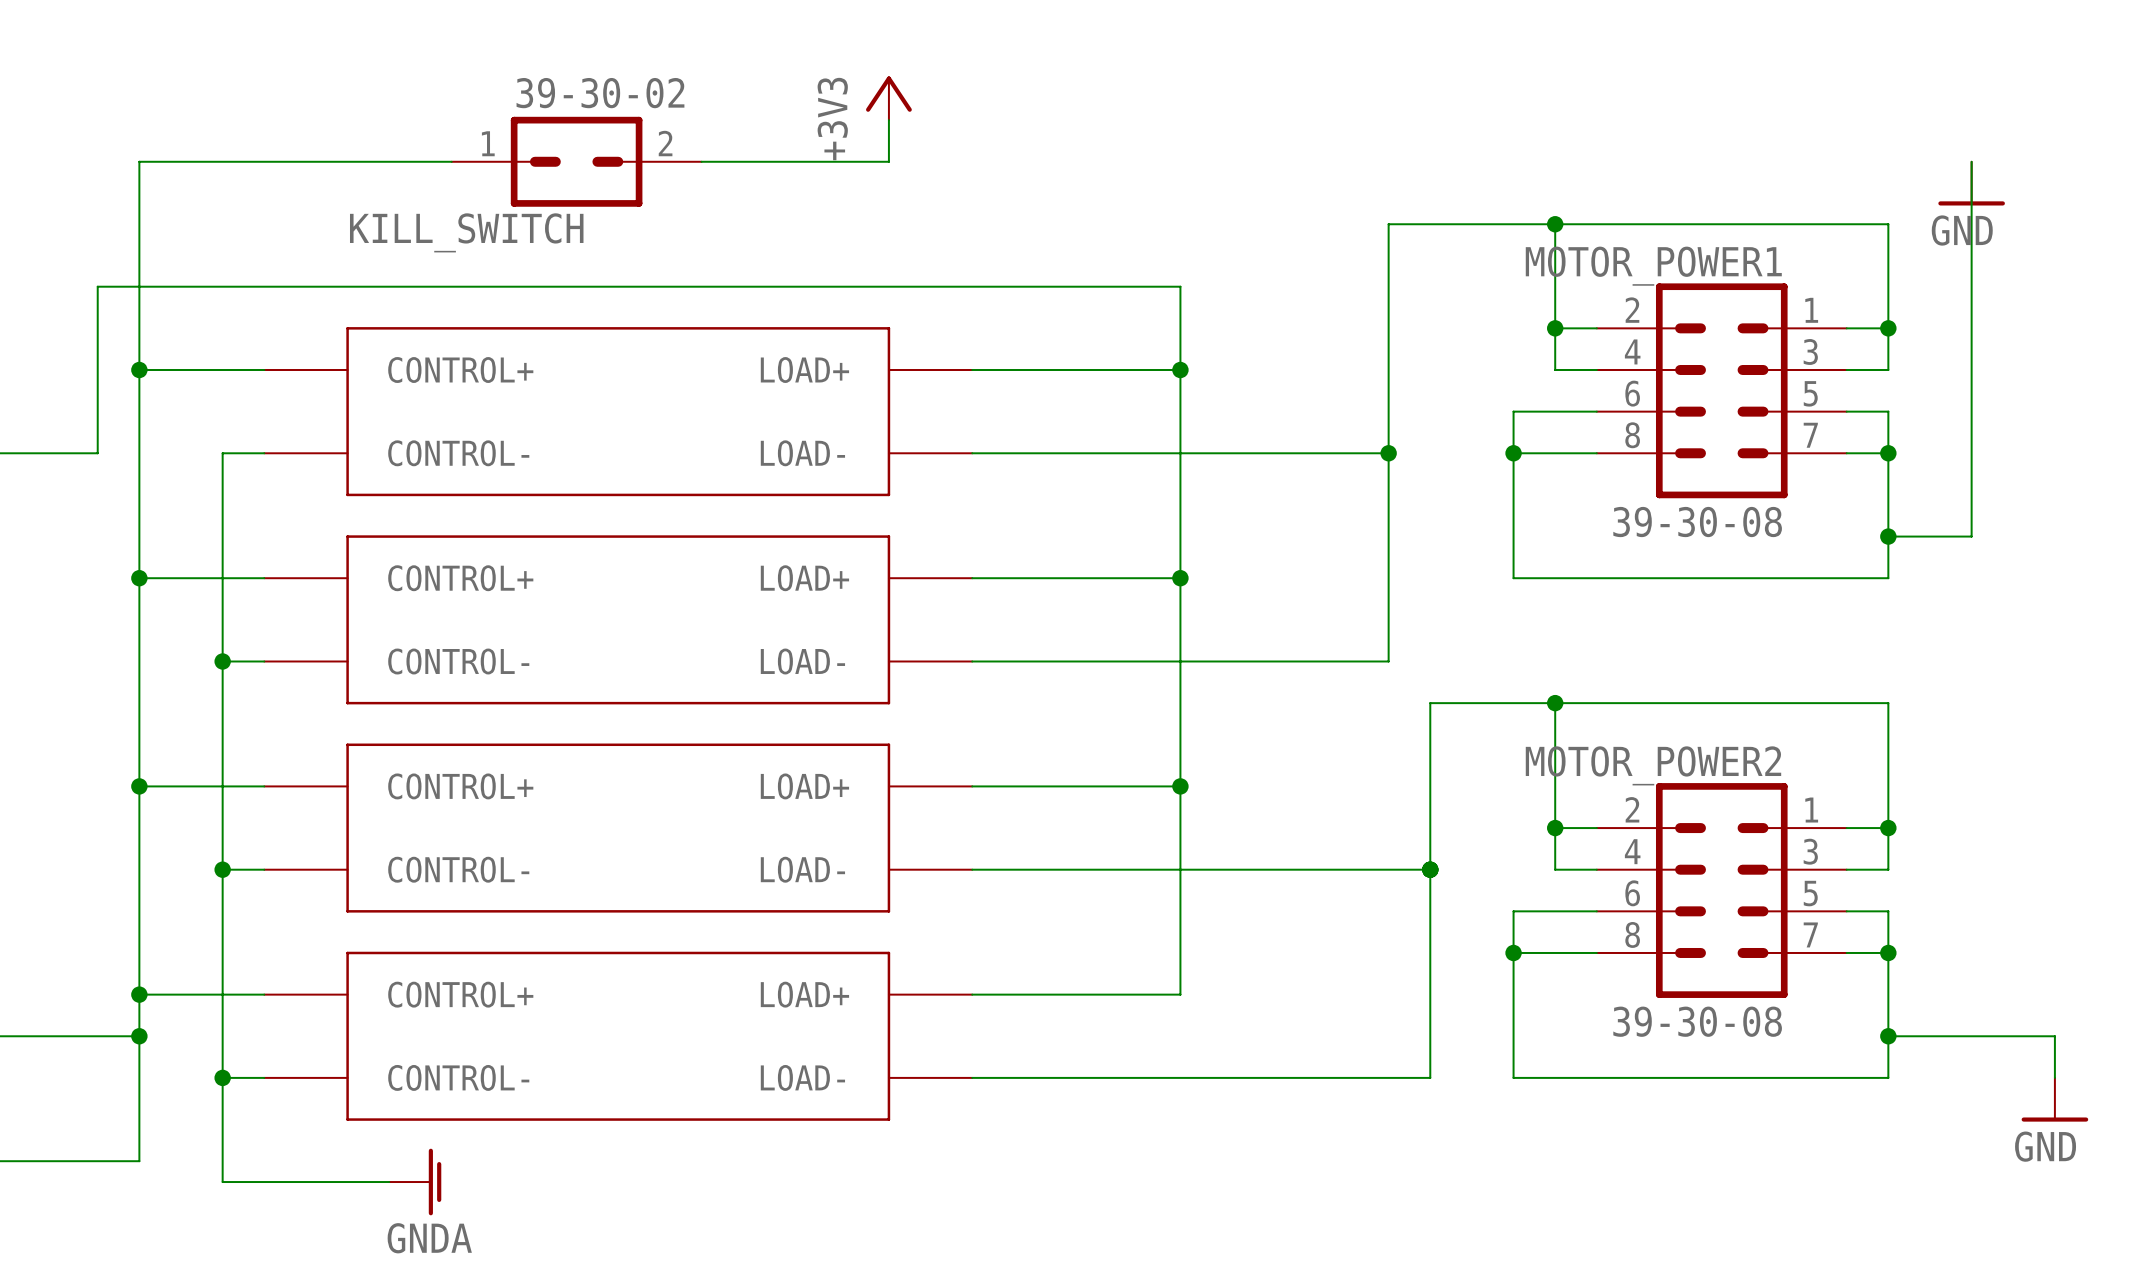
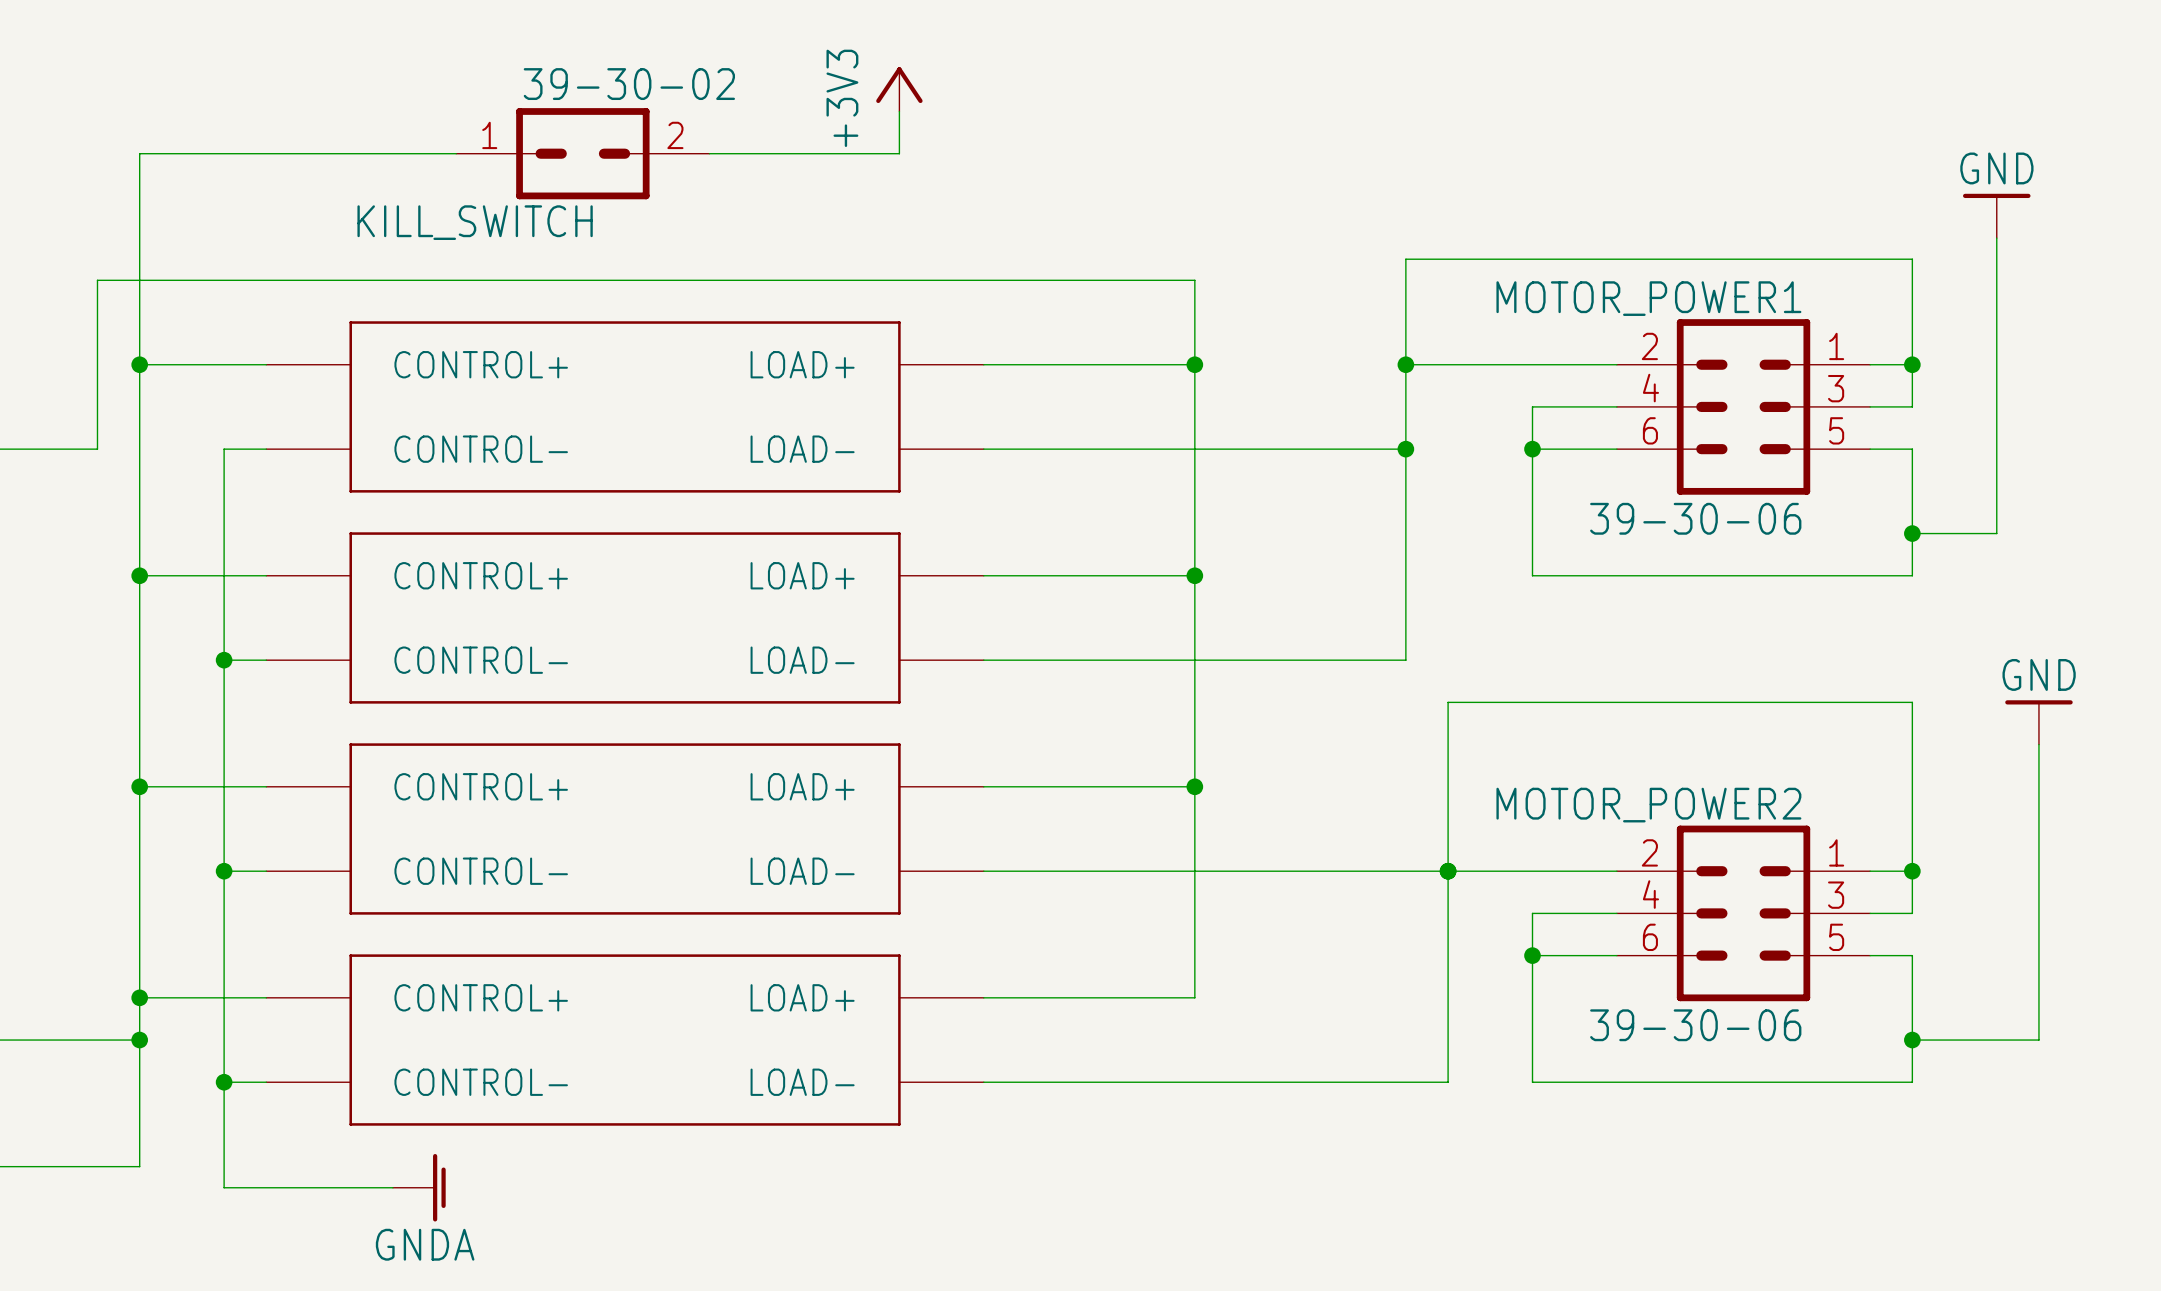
power symbol rotation: 0° (1971, 203) -> 180° (1996, 195)
wire: (1555, 224) (1555, 369) -> (1405, 364) (1574, 364)
junction: (1555, 224) -> none
wire: (1388, 265) (1388, 224) (1888, 224) (1888, 265) -> (1405, 259) (1912, 259)
MOTOR_POWER1 symbol: [1596, 283, 1847, 499] -> [1616, 319, 1871, 495]
wire: (1555, 328) (1596, 328) -> none
junction: (1555, 328) -> none
wire: (1846, 328) (1888, 328) -> none
junction: (1888, 328) -> none
junction: none -> (1405, 364)
junction: none -> (1912, 364)
wire: (1888, 411) (1888, 453) -> (1912, 406) (1912, 364)
junction: (1888, 453) -> none
MOTOR_POWER1 value: 39-30-08 (1697, 522) -> 39-30-06 (1695, 518)
wire: (1555, 703) (1555, 869) -> (1448, 871) (1574, 871)
junction: (1555, 703) -> none
power symbol: none -> GND (2038, 722)
MOTOR_POWER2 symbol: [1596, 783, 1847, 998] -> [1616, 825, 1871, 1002]
wire: (1555, 828) (1596, 828) -> none
junction: (1555, 828) -> none
wire: (1846, 828) (1888, 828) -> none
junction: (1888, 828) -> none
junction: none -> (1912, 871)
wire: (1888, 911) (1888, 952) -> (1912, 913) (1912, 871)
junction: (1888, 952) -> none
MOTOR_POWER2 value: 39-30-08 (1697, 1021) -> 39-30-06 (1695, 1025)
wire: (2013, 1036) (2054, 1036) (2054, 1077) -> (2038, 1040) (2038, 744)
power symbol: GND (2054, 1099) -> none

